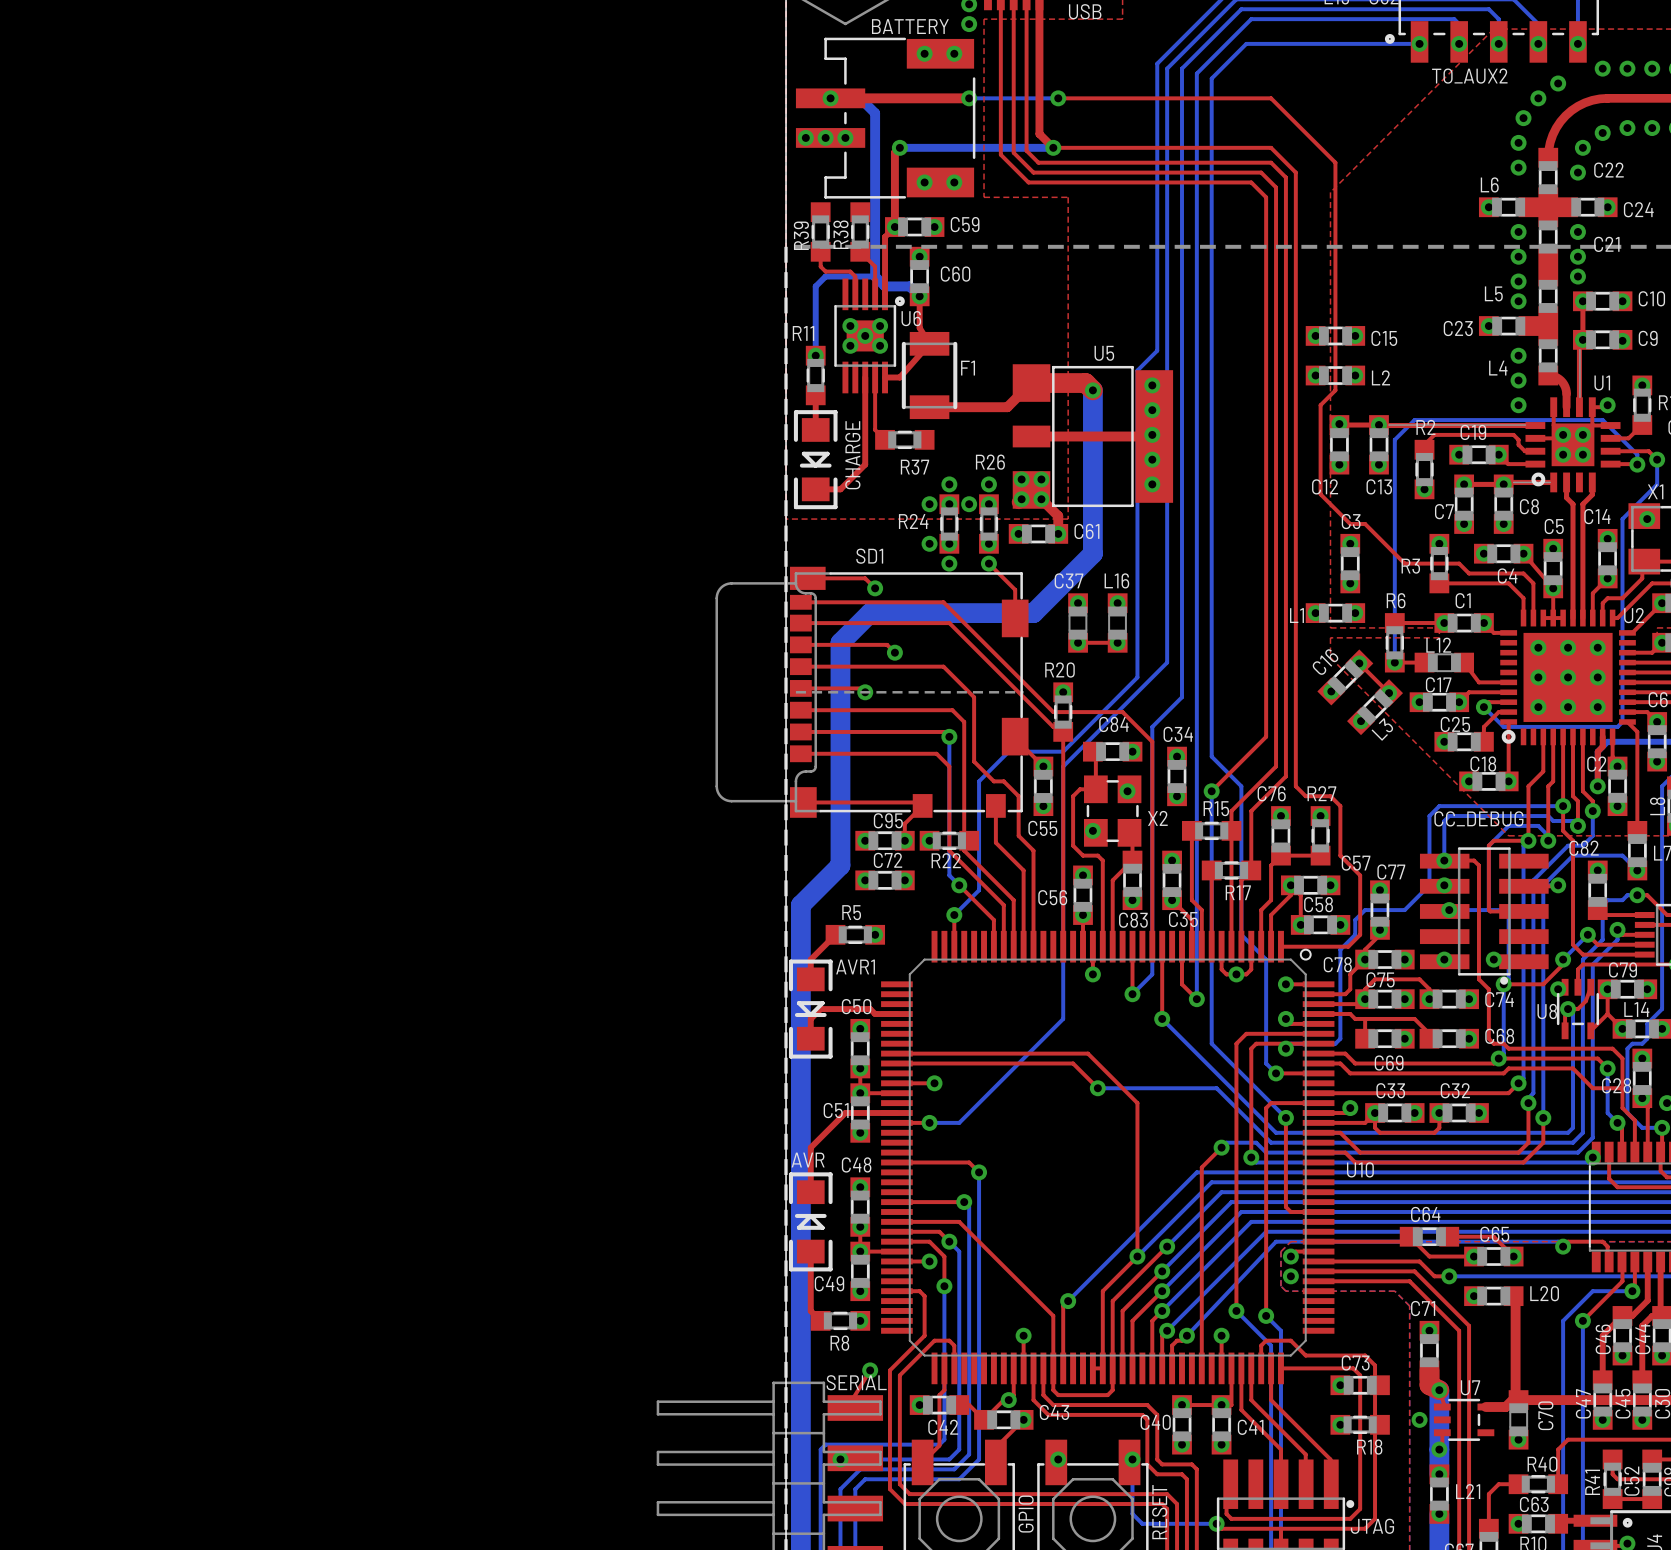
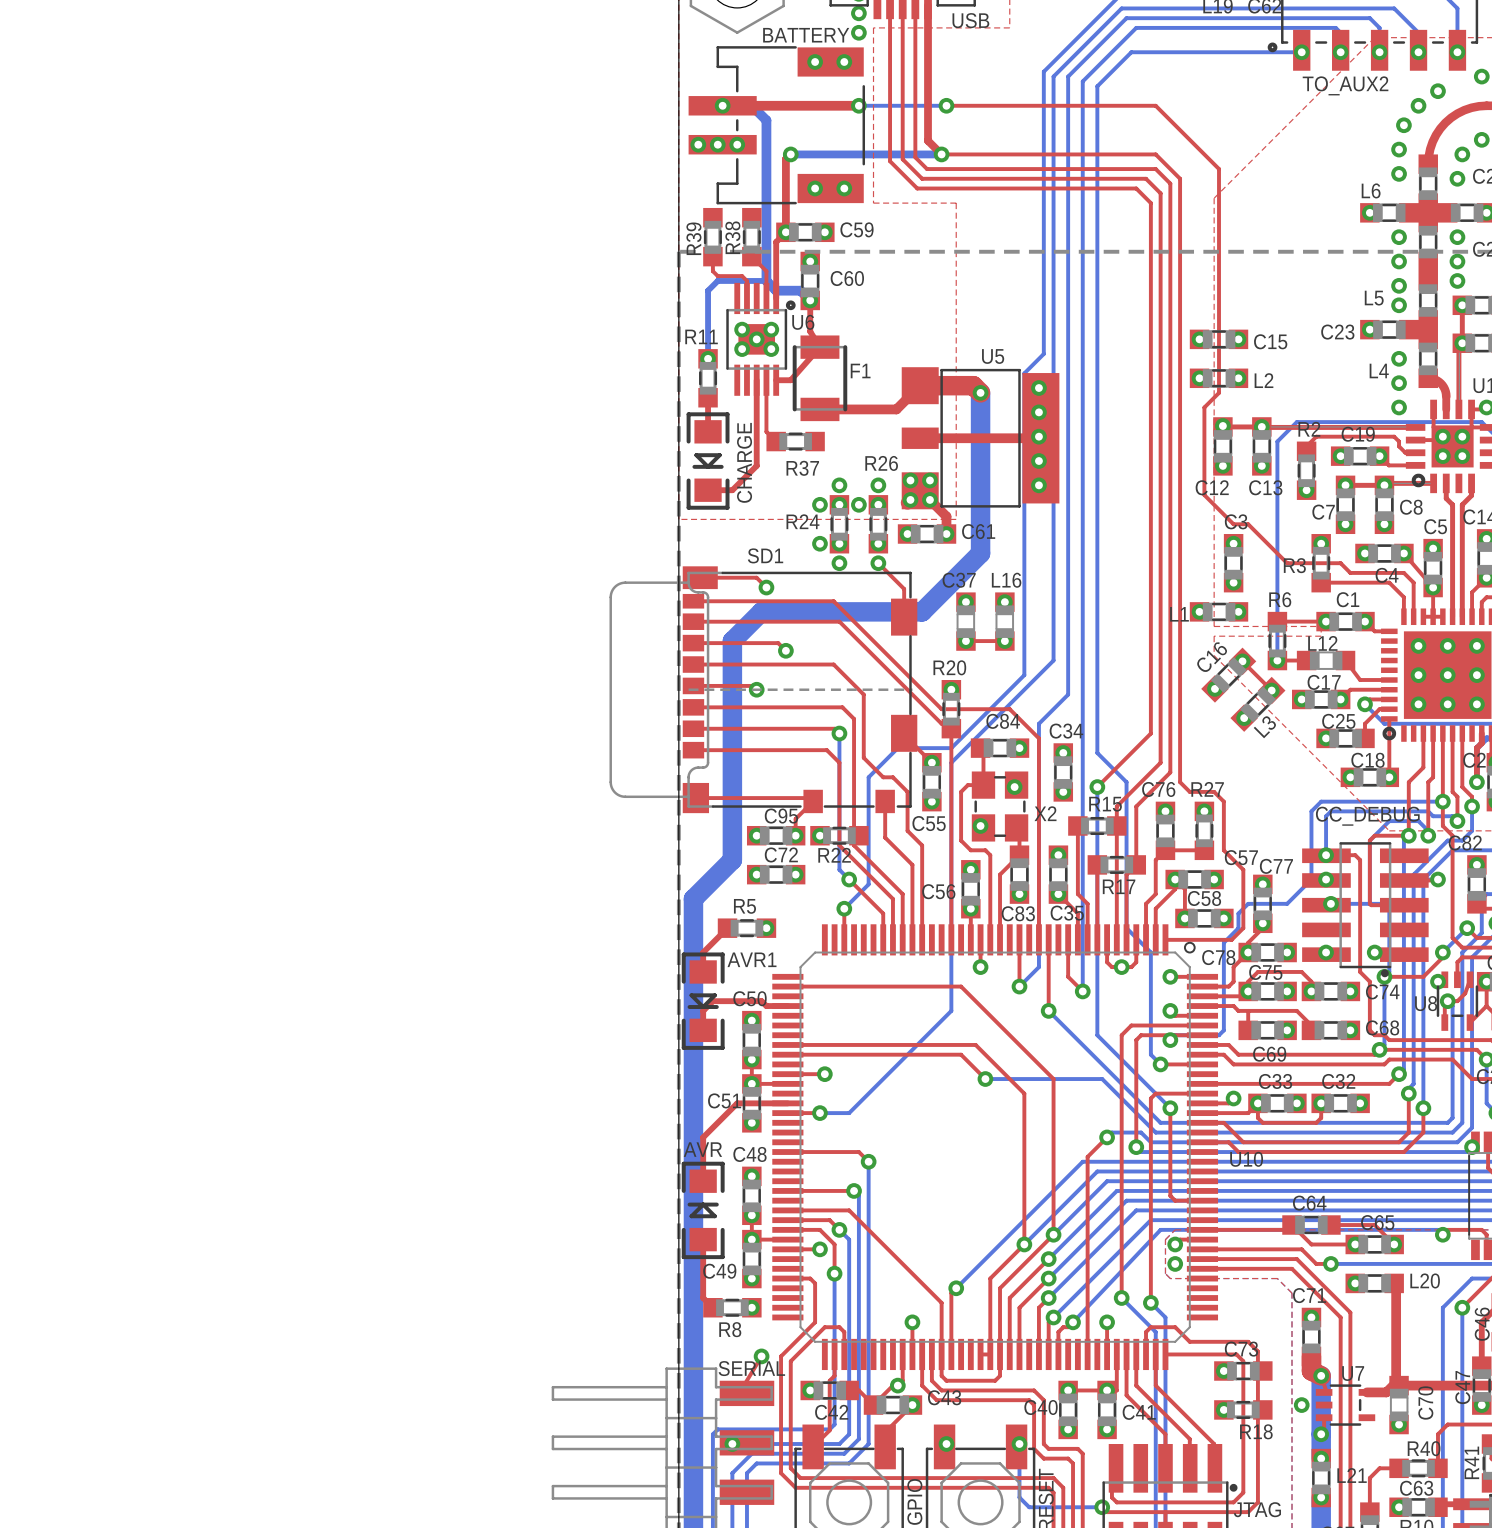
top track: none -> (787, 986) (961, 986) (1053, 1079) (1053, 1234)

